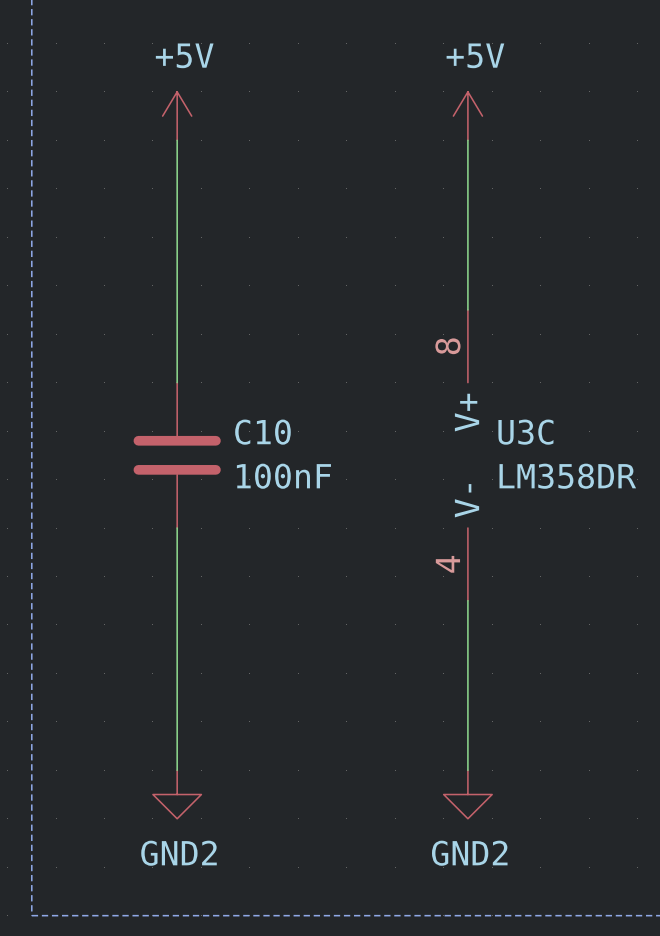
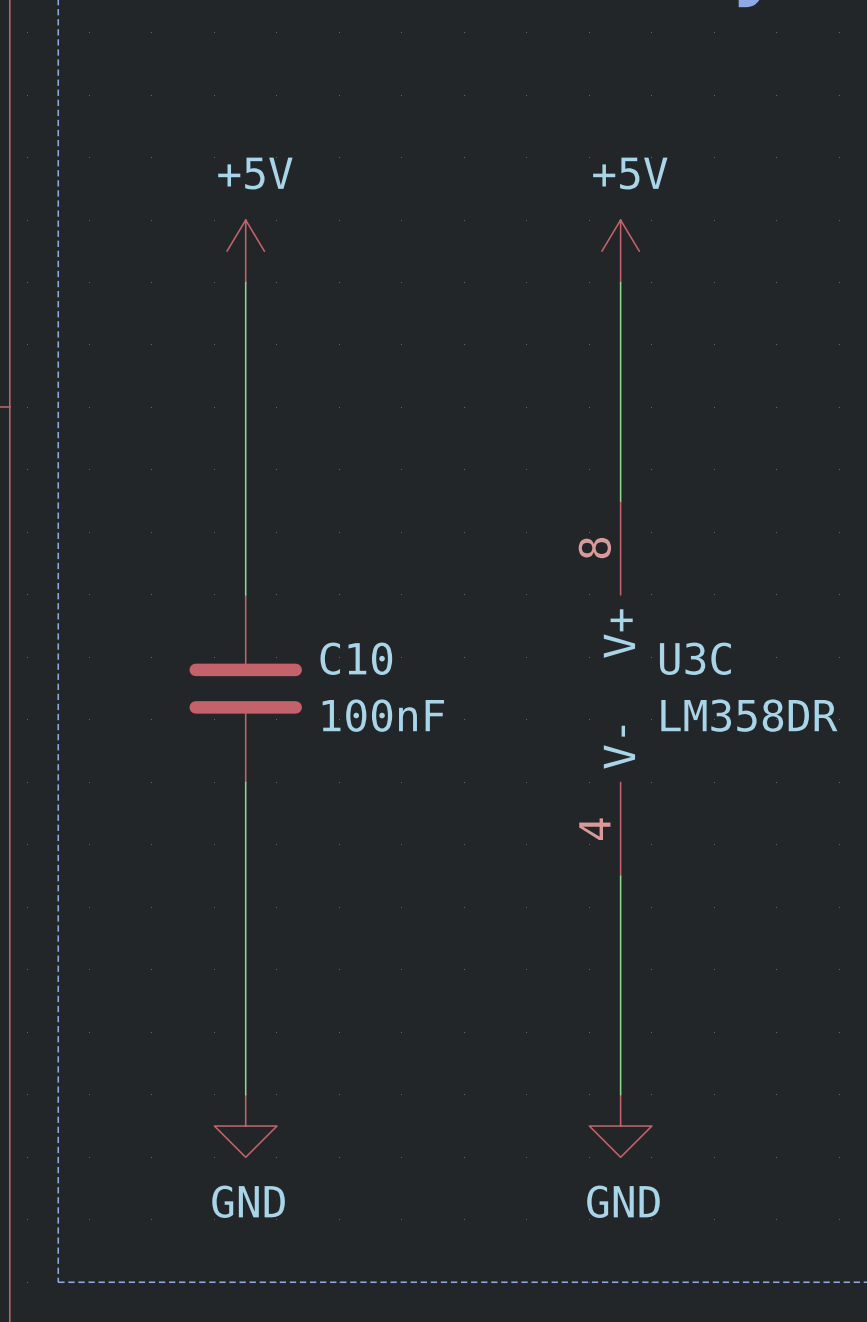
power symbol: GND2 (177, 794) -> GND (245, 1126)
power symbol: GND2 (467, 794) -> GND (620, 1126)

